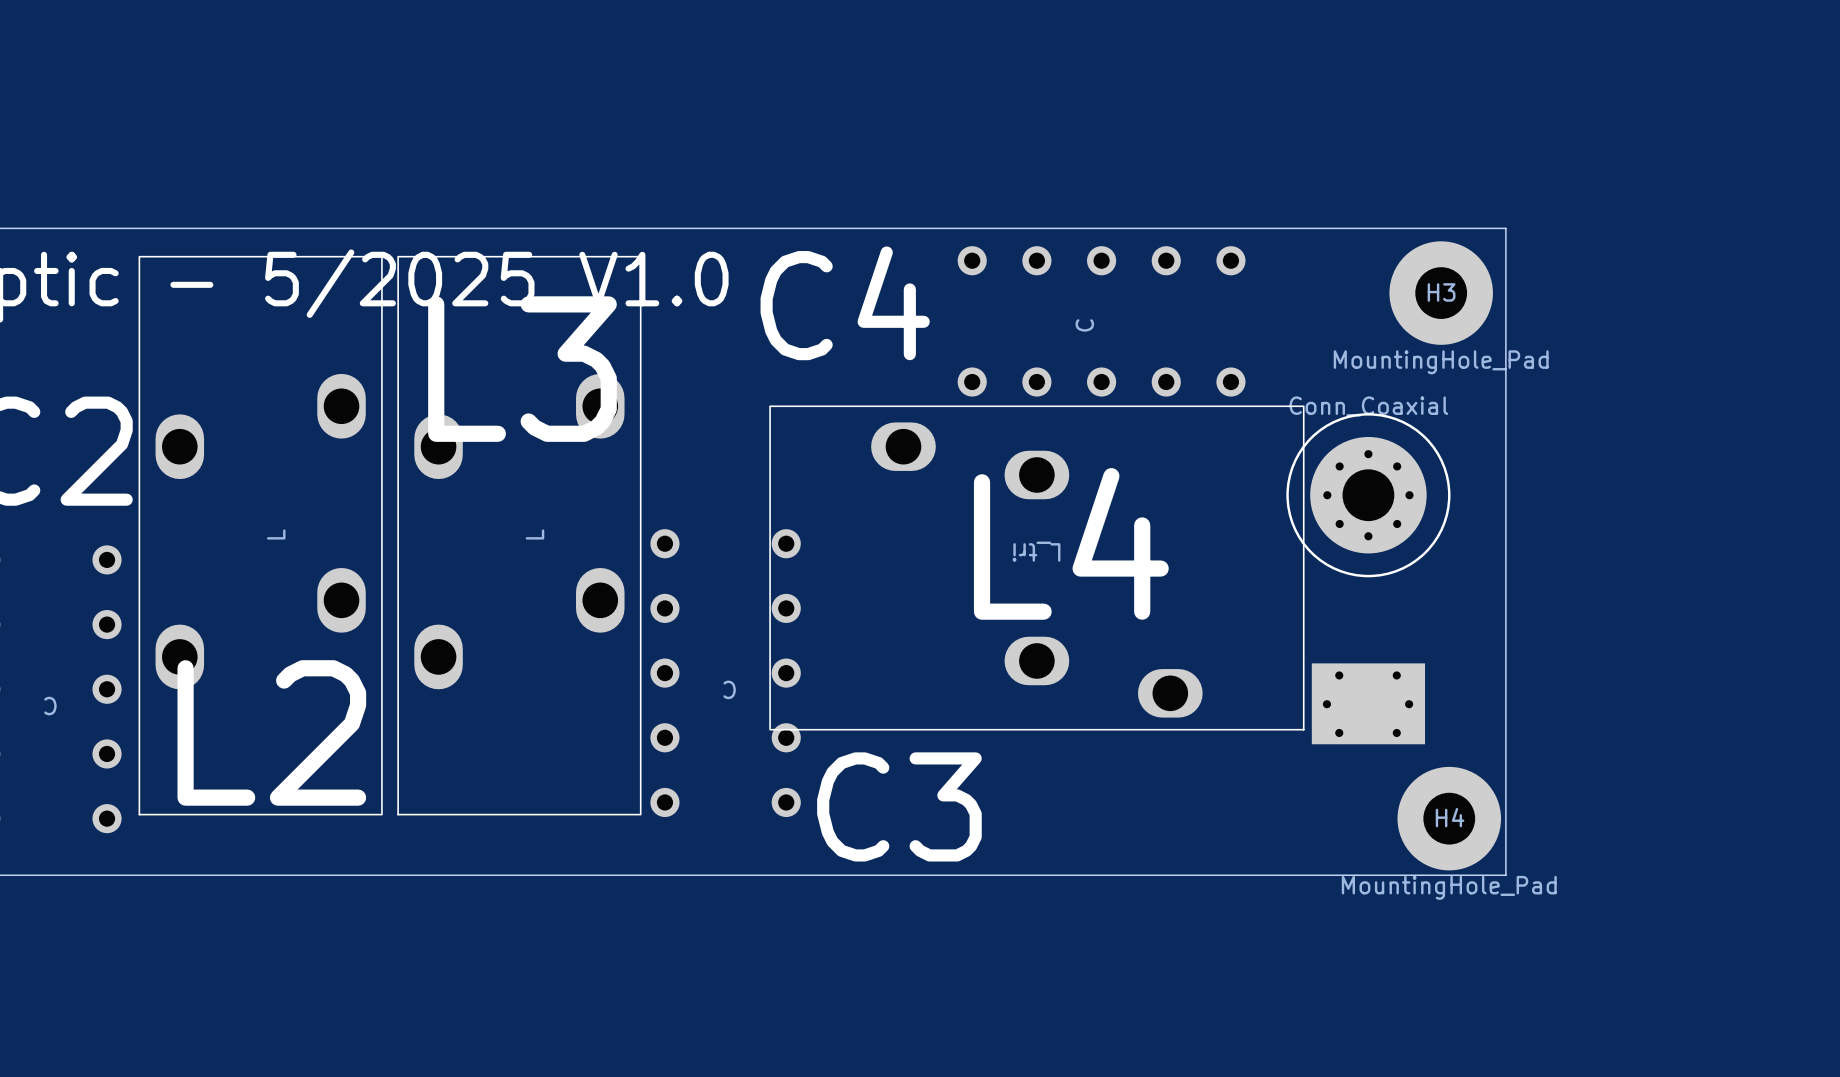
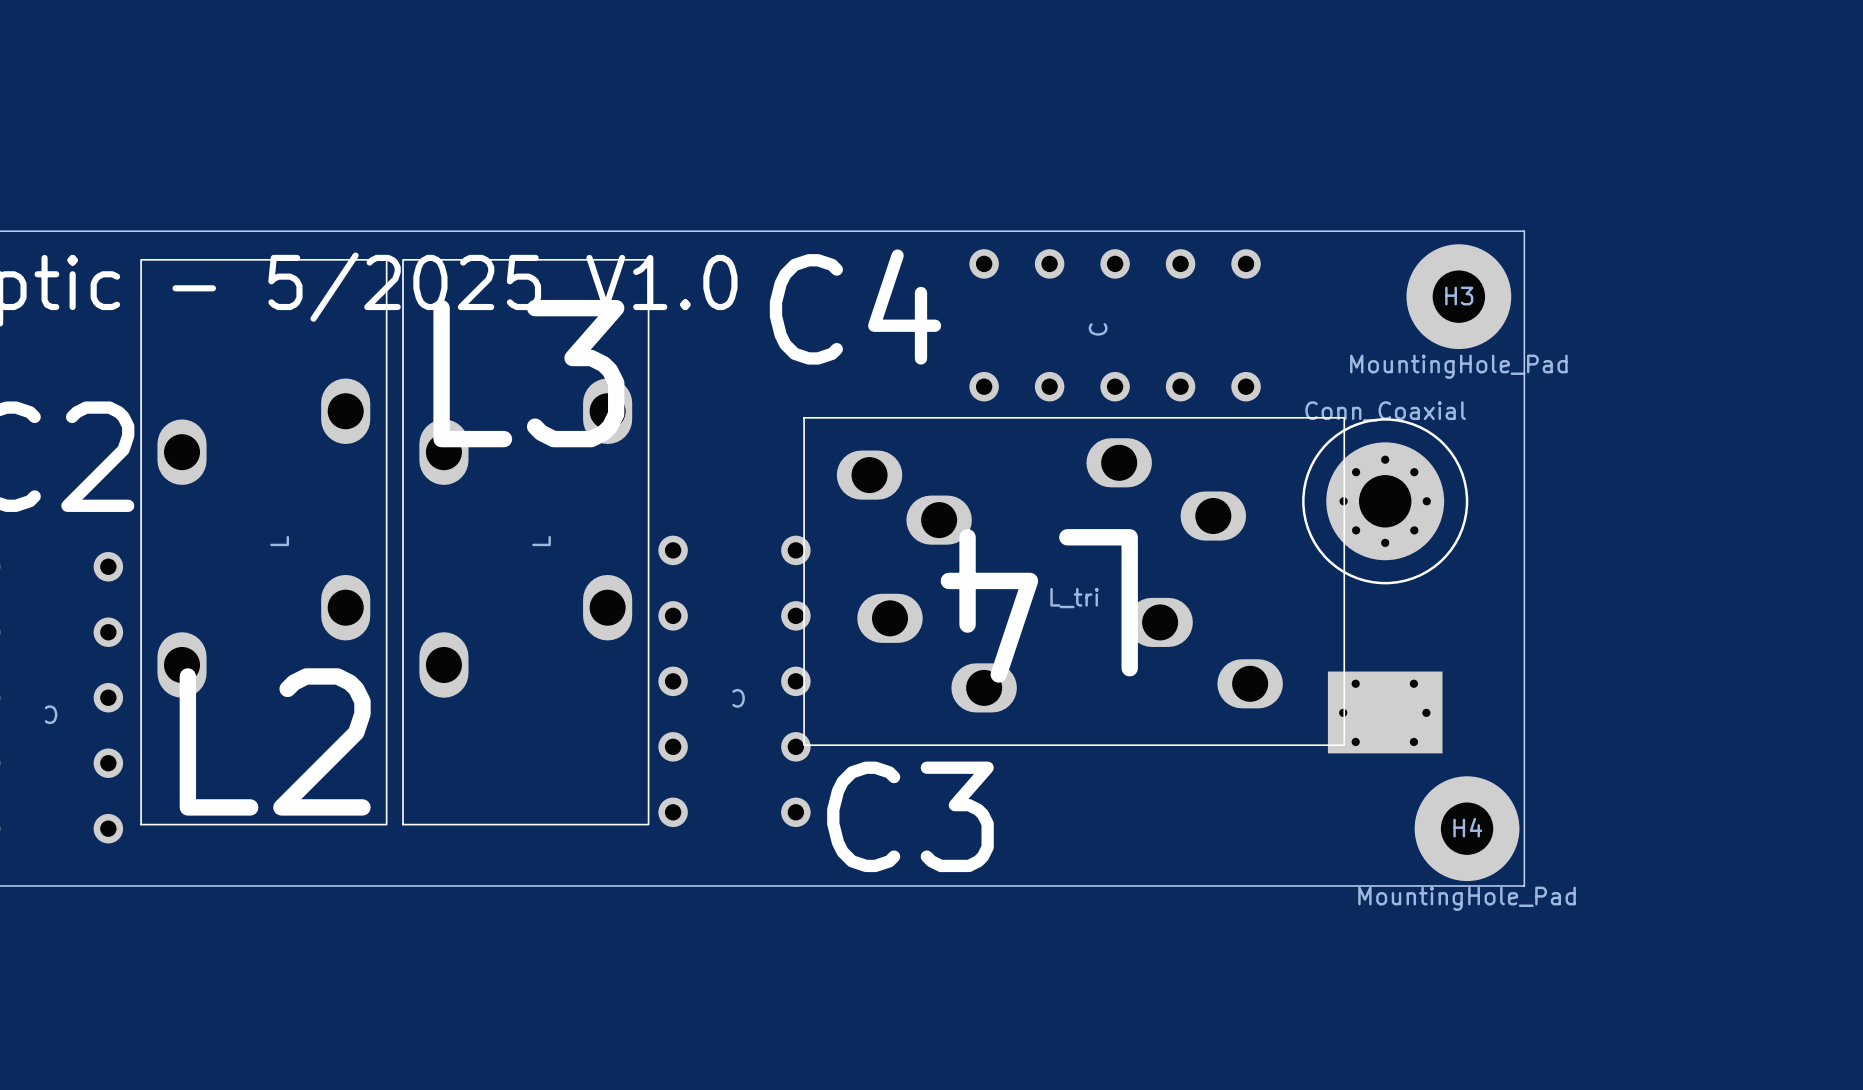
L4 footprint: [769, 405, 1305, 731] -> [803, 416, 1346, 747]
L4 name position: L4 (1071, 543) -> L4 (1039, 605)
L4 value position: L_tri (1036, 551) -> L_tri (1074, 598)

